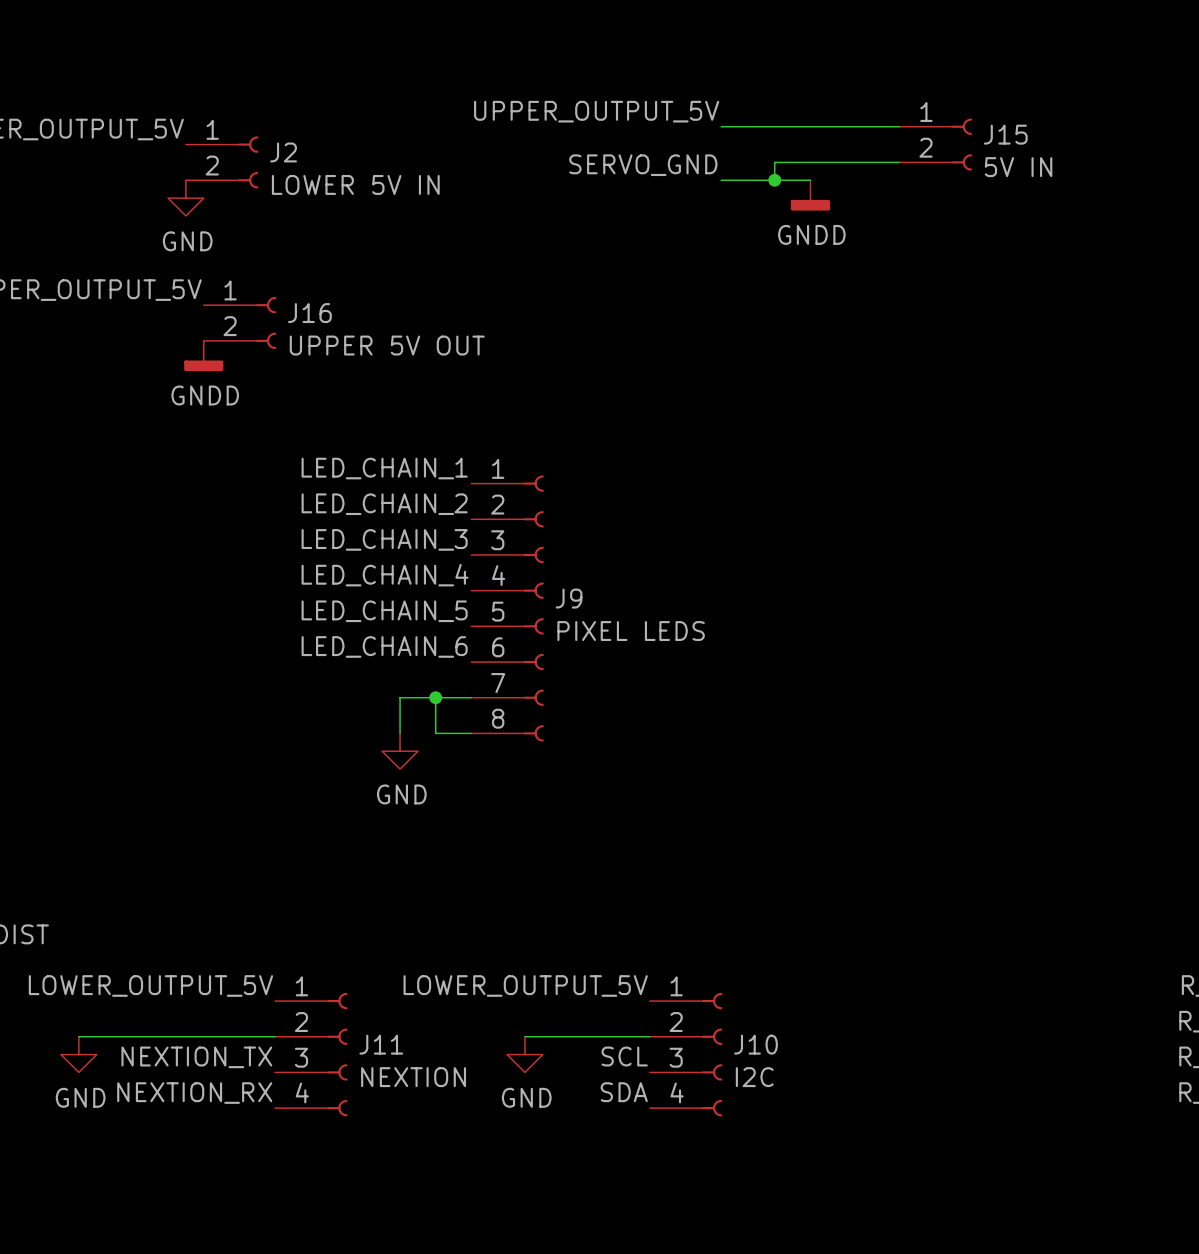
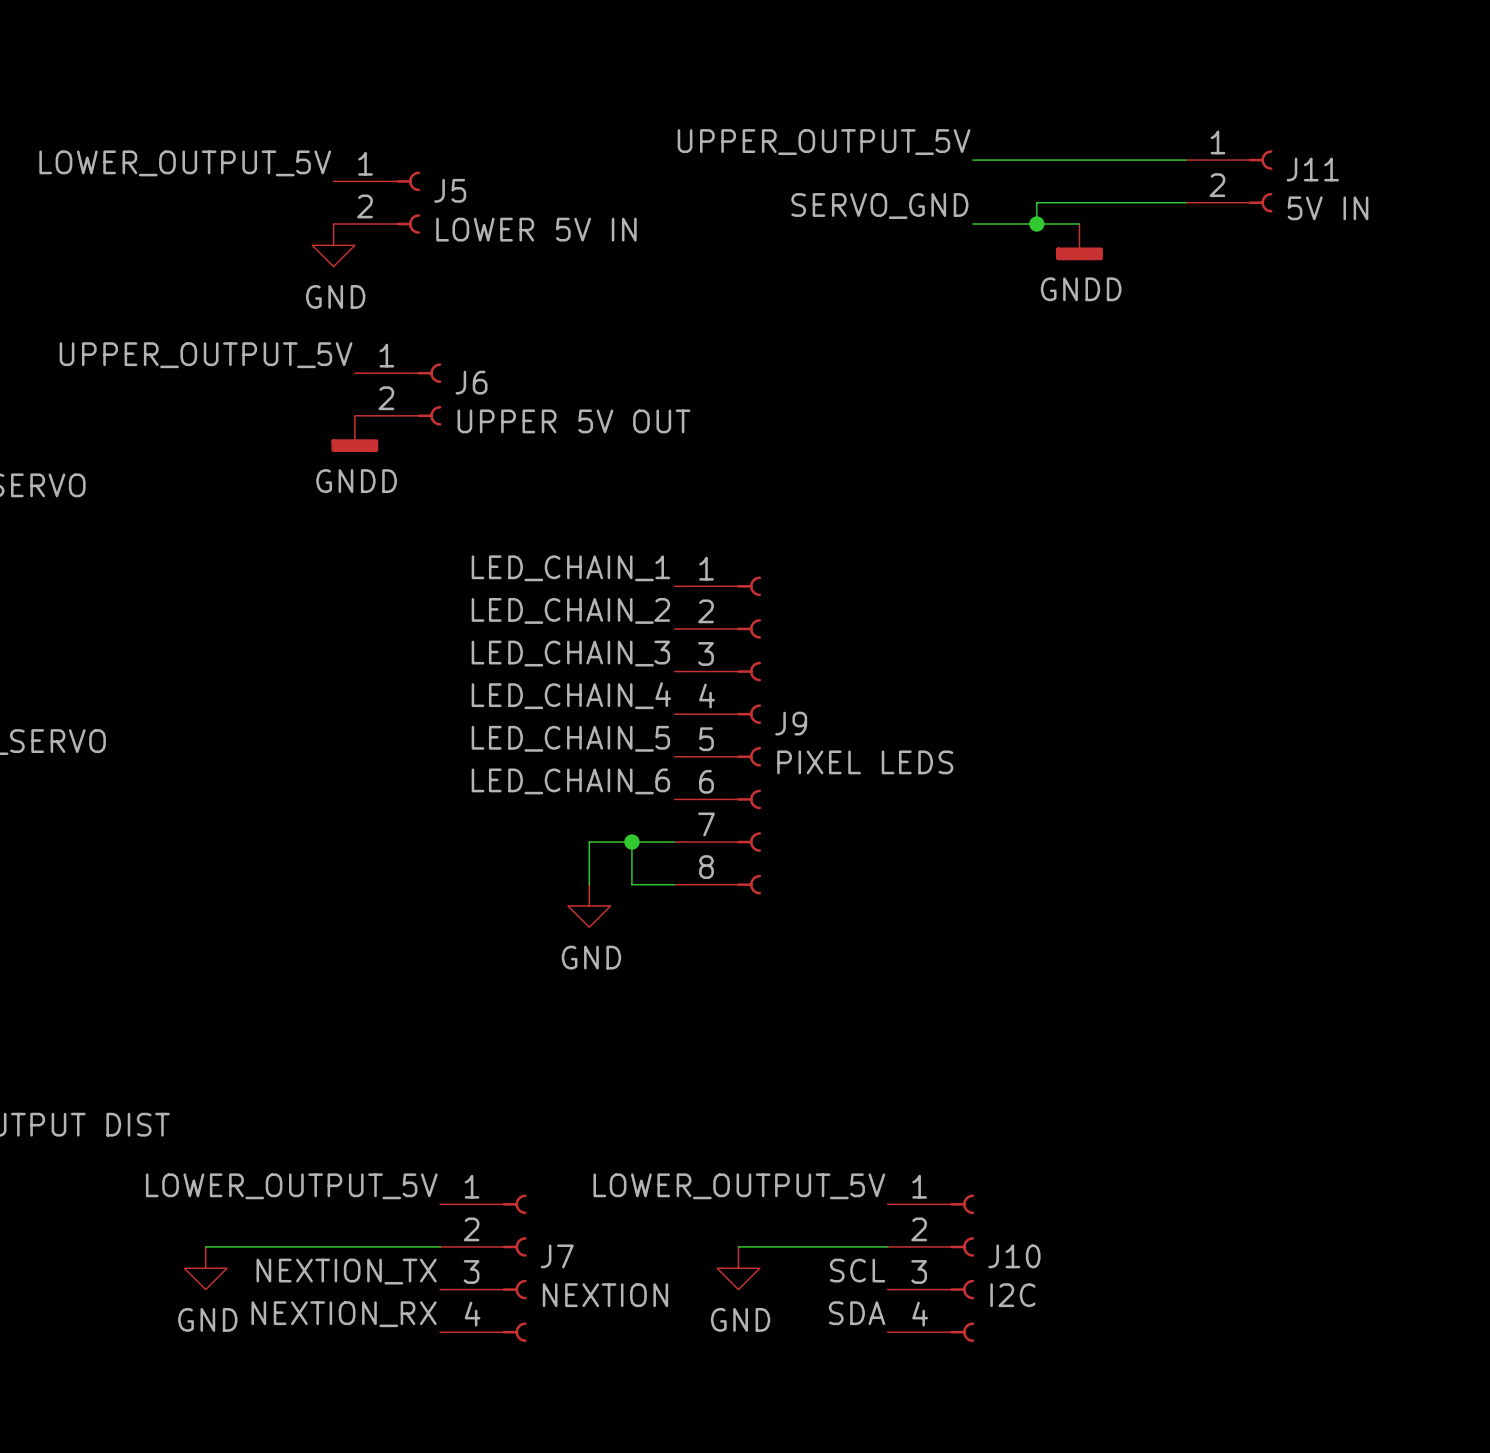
J15 name: J15 (1005, 134) -> J11 (1312, 169)
J2 name: J2 (283, 152) -> J5 (450, 190)
J16 name: J16 (309, 313) -> J6 (471, 382)
J11 name: J11 (381, 1044) -> J7 (557, 1256)

